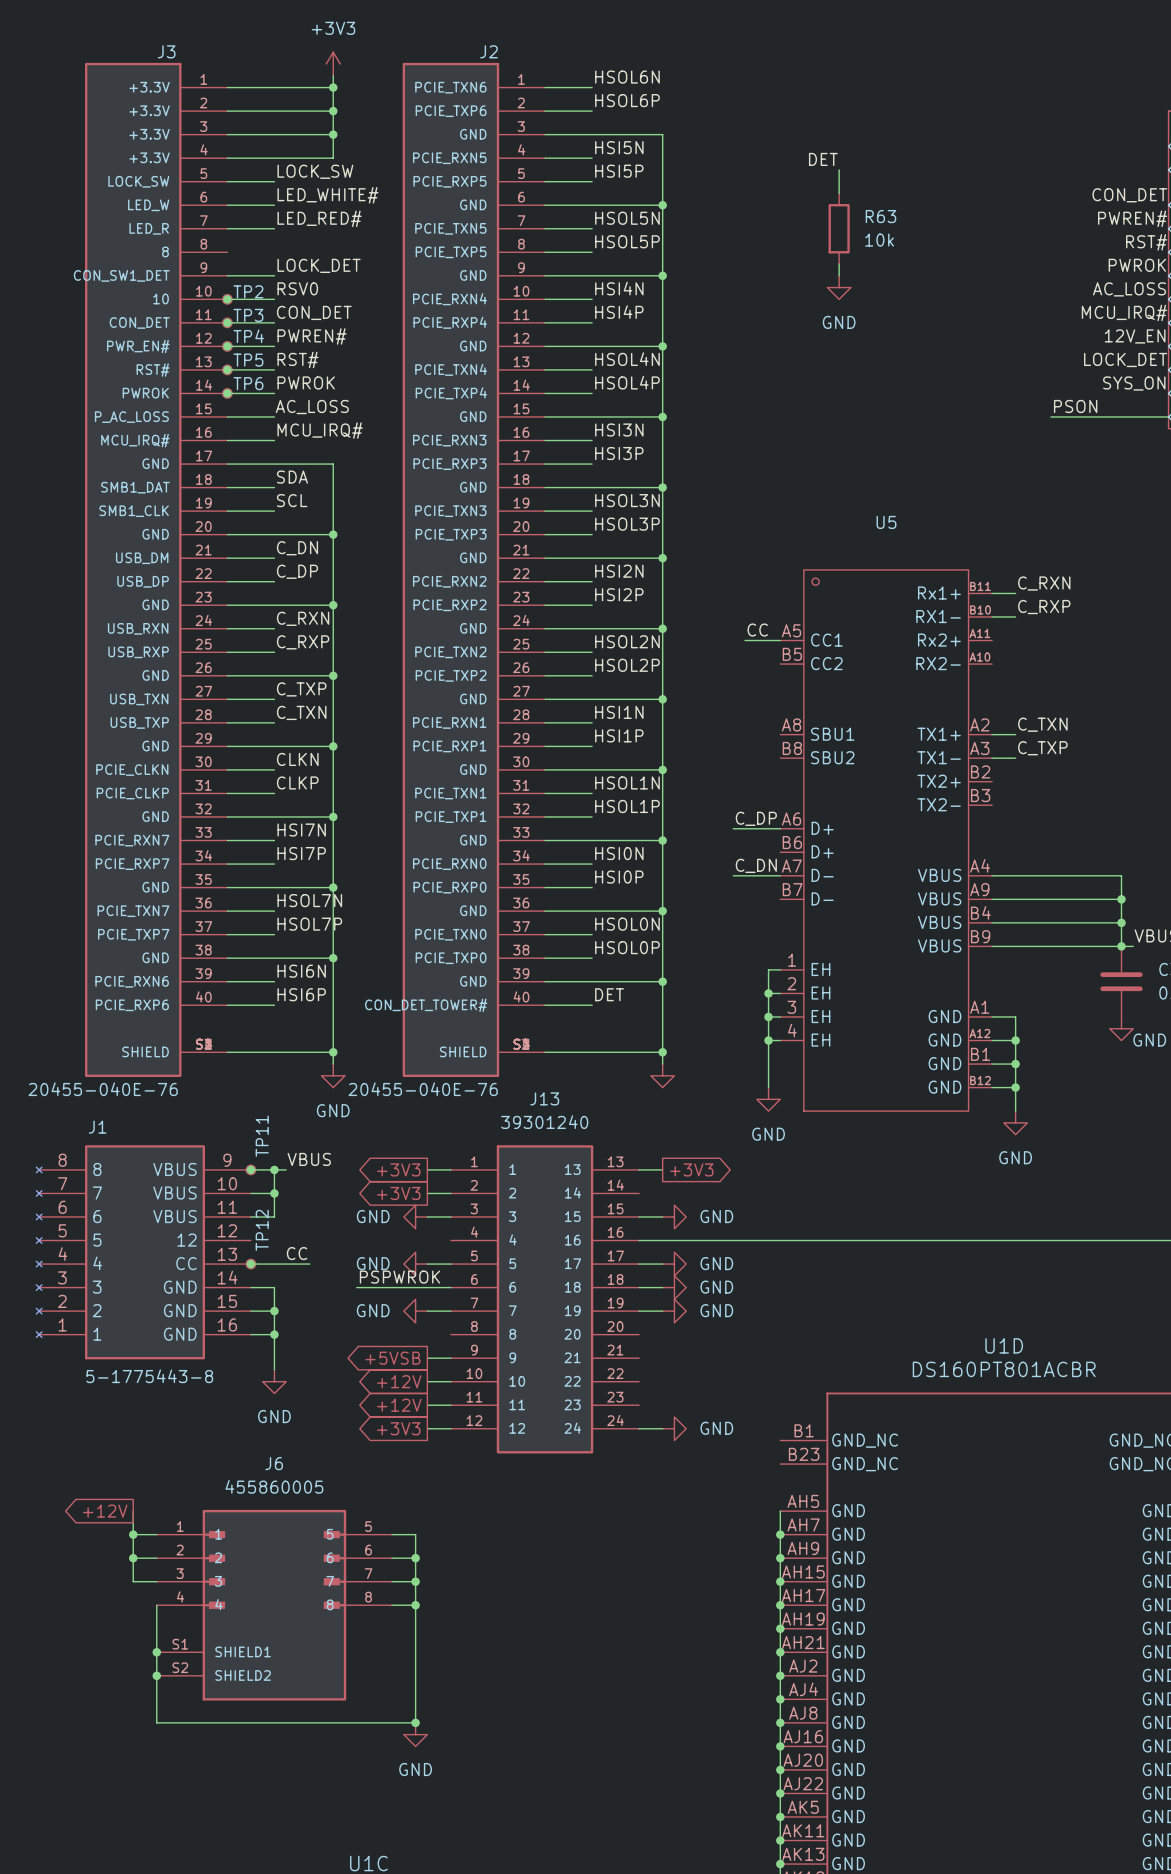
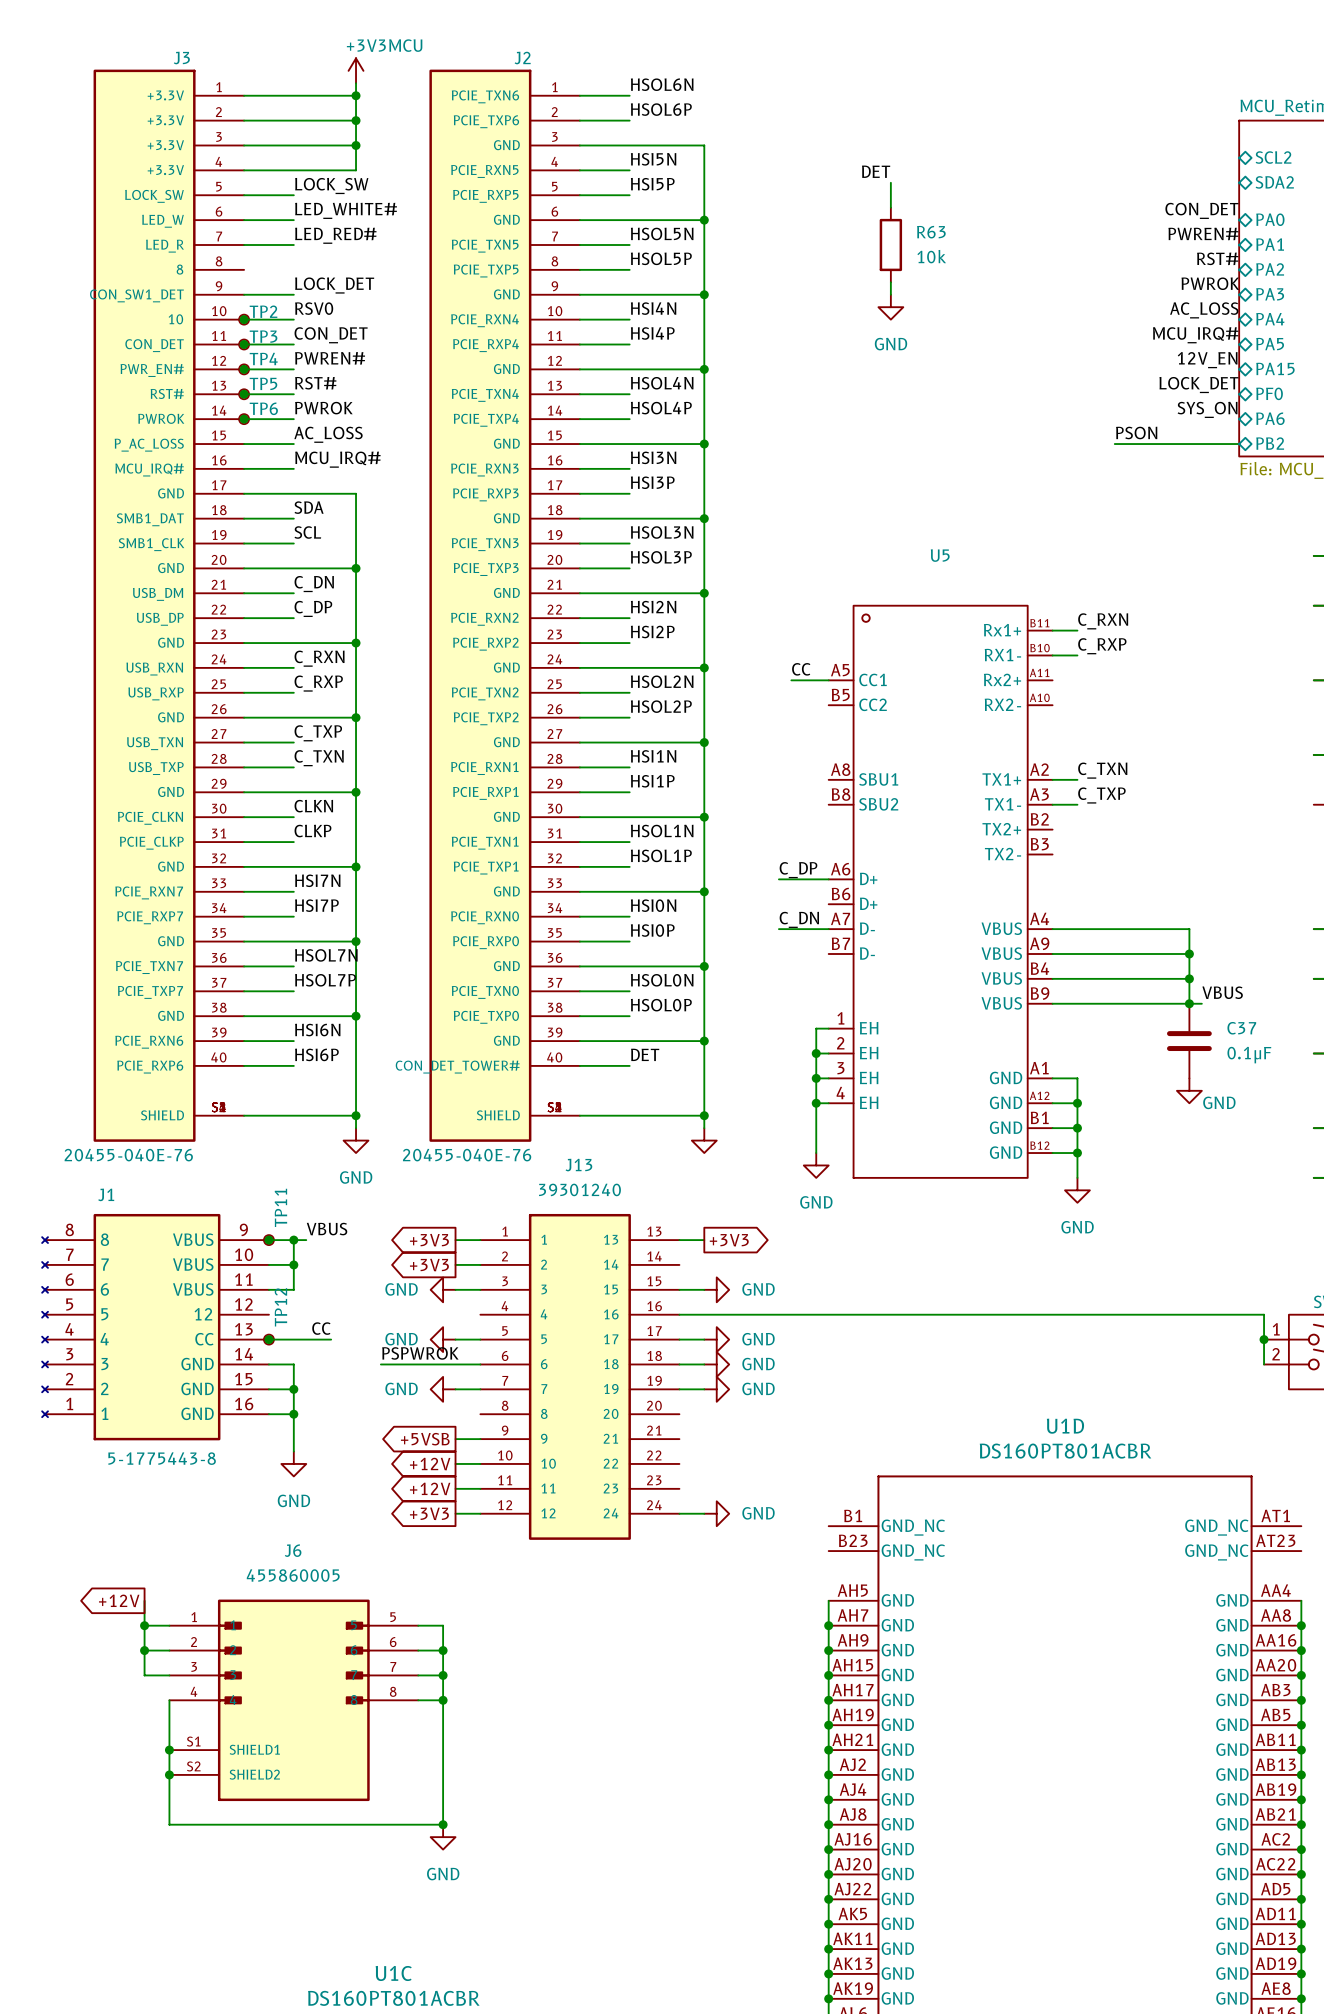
power symbol: +3V3 (333, 64) -> +3V3MCU (356, 70)

